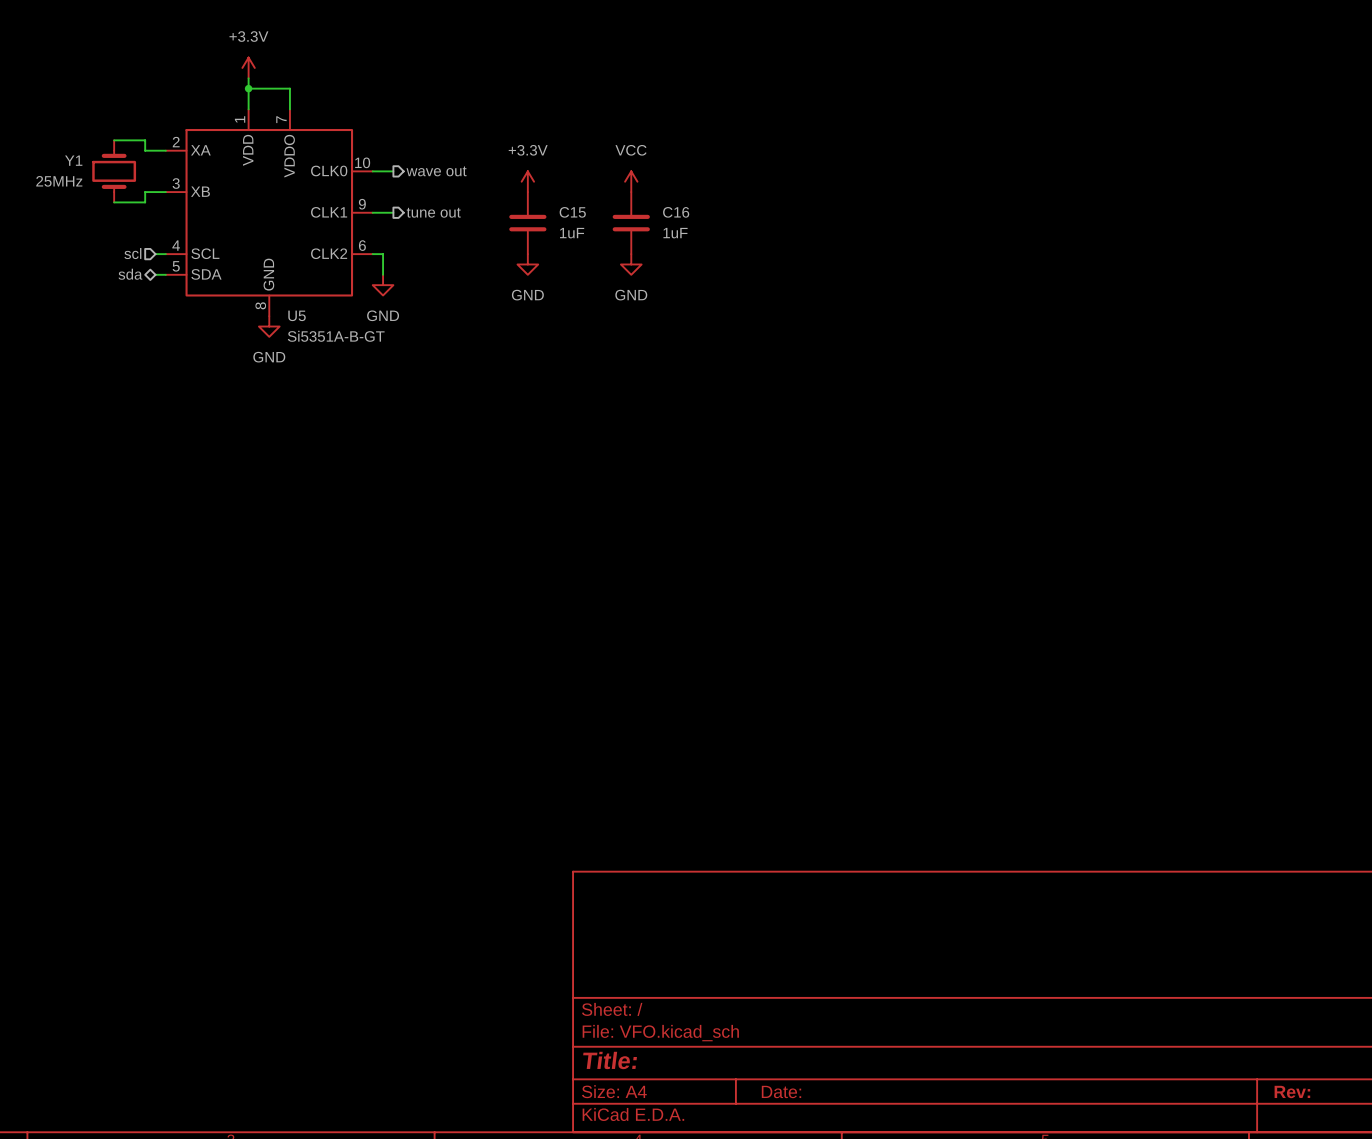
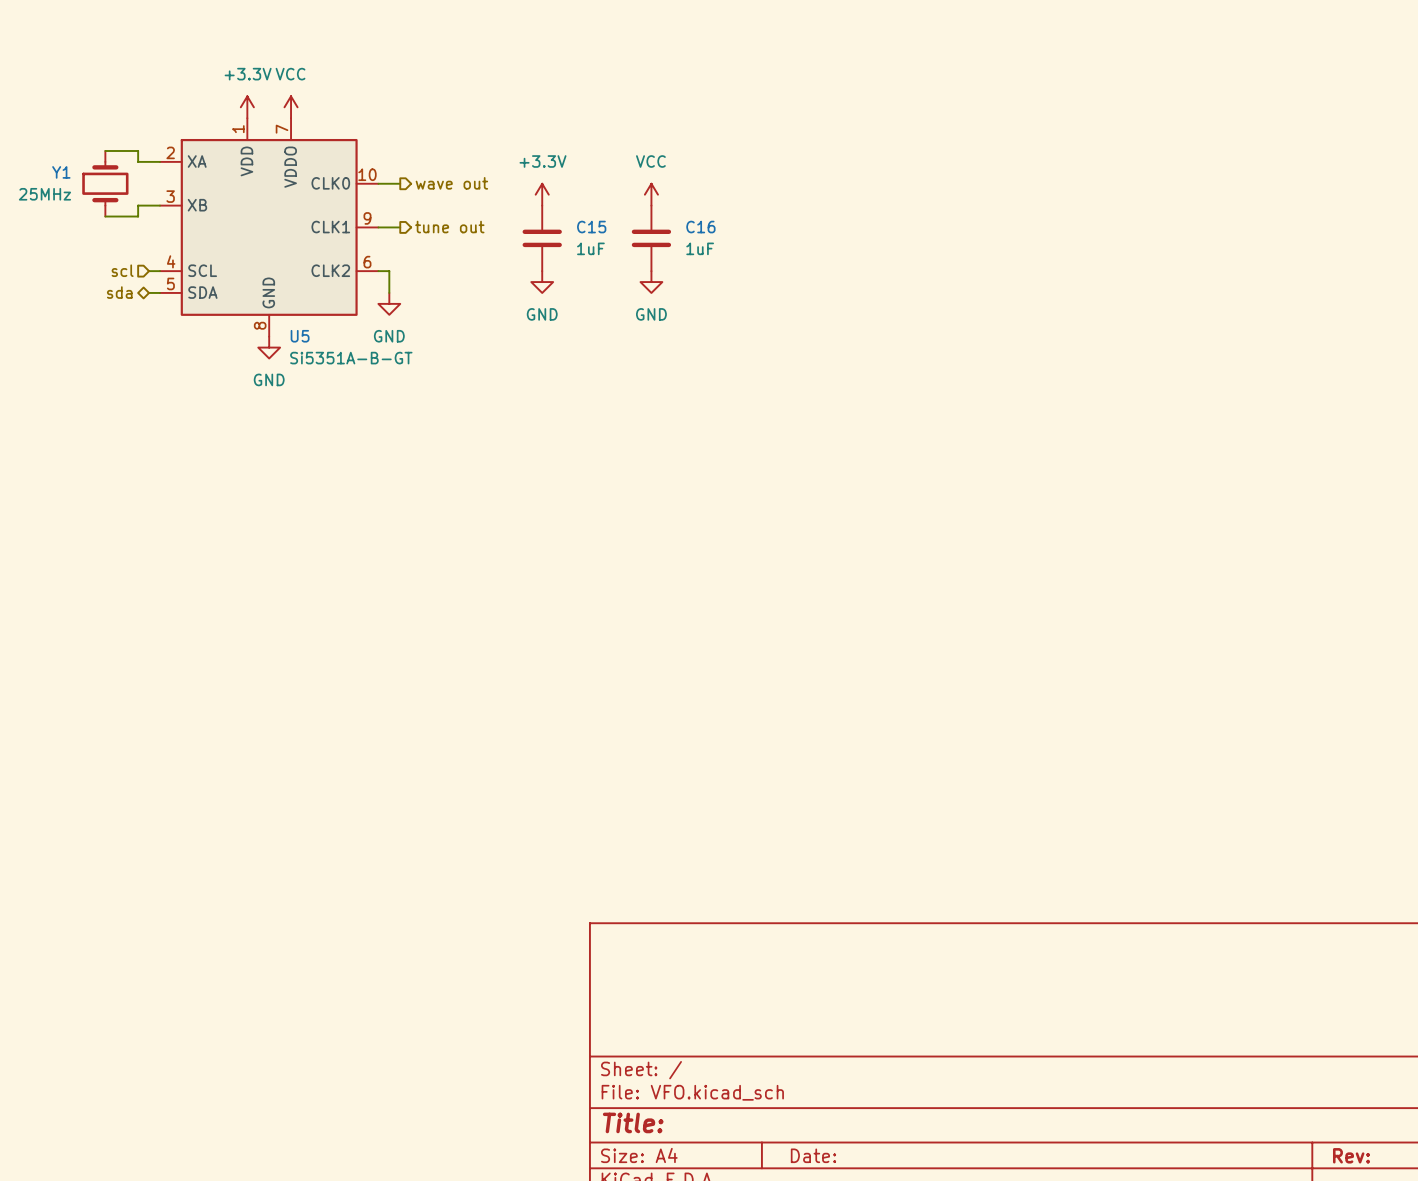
power symbol position: +3.3V (248, 67) -> +3.3V (247, 107)
wire: (248, 88) (289, 88) (289, 109) -> none
junction: (248, 88) -> none
power symbol: none -> VCC (291, 107)

